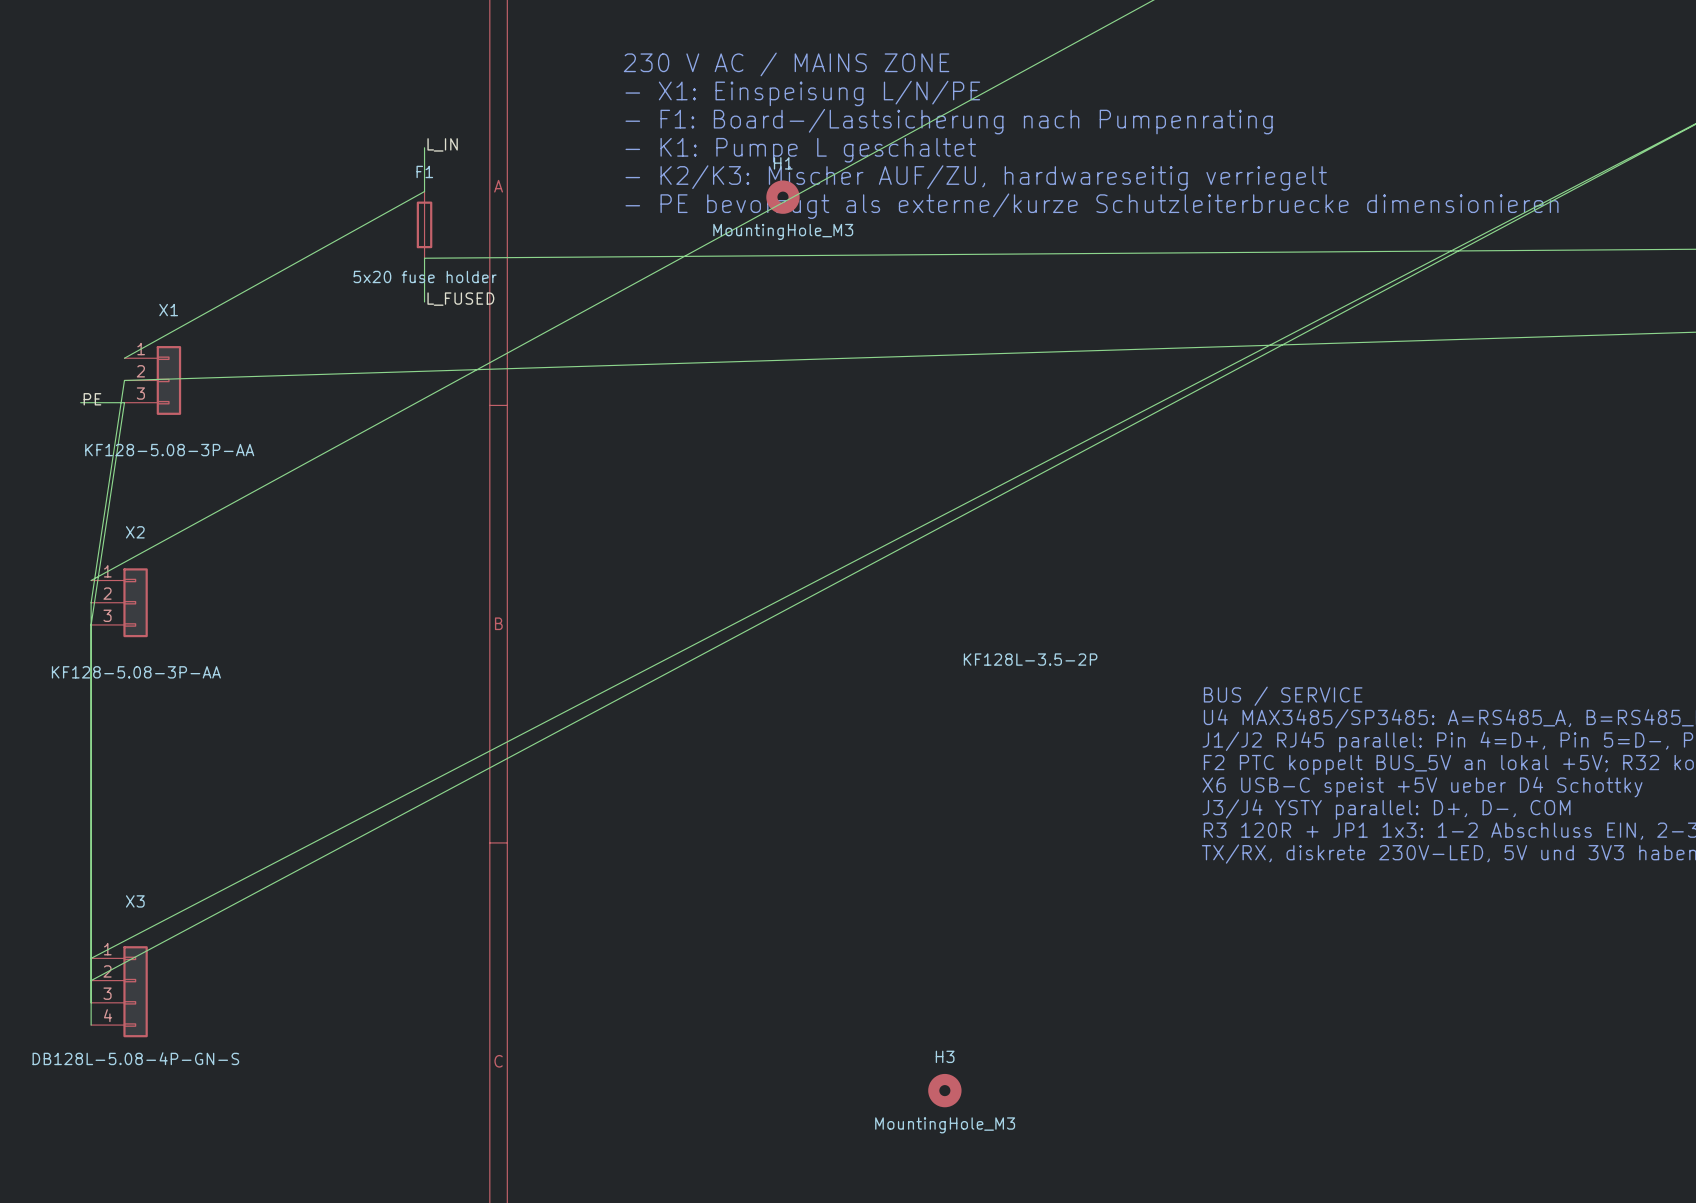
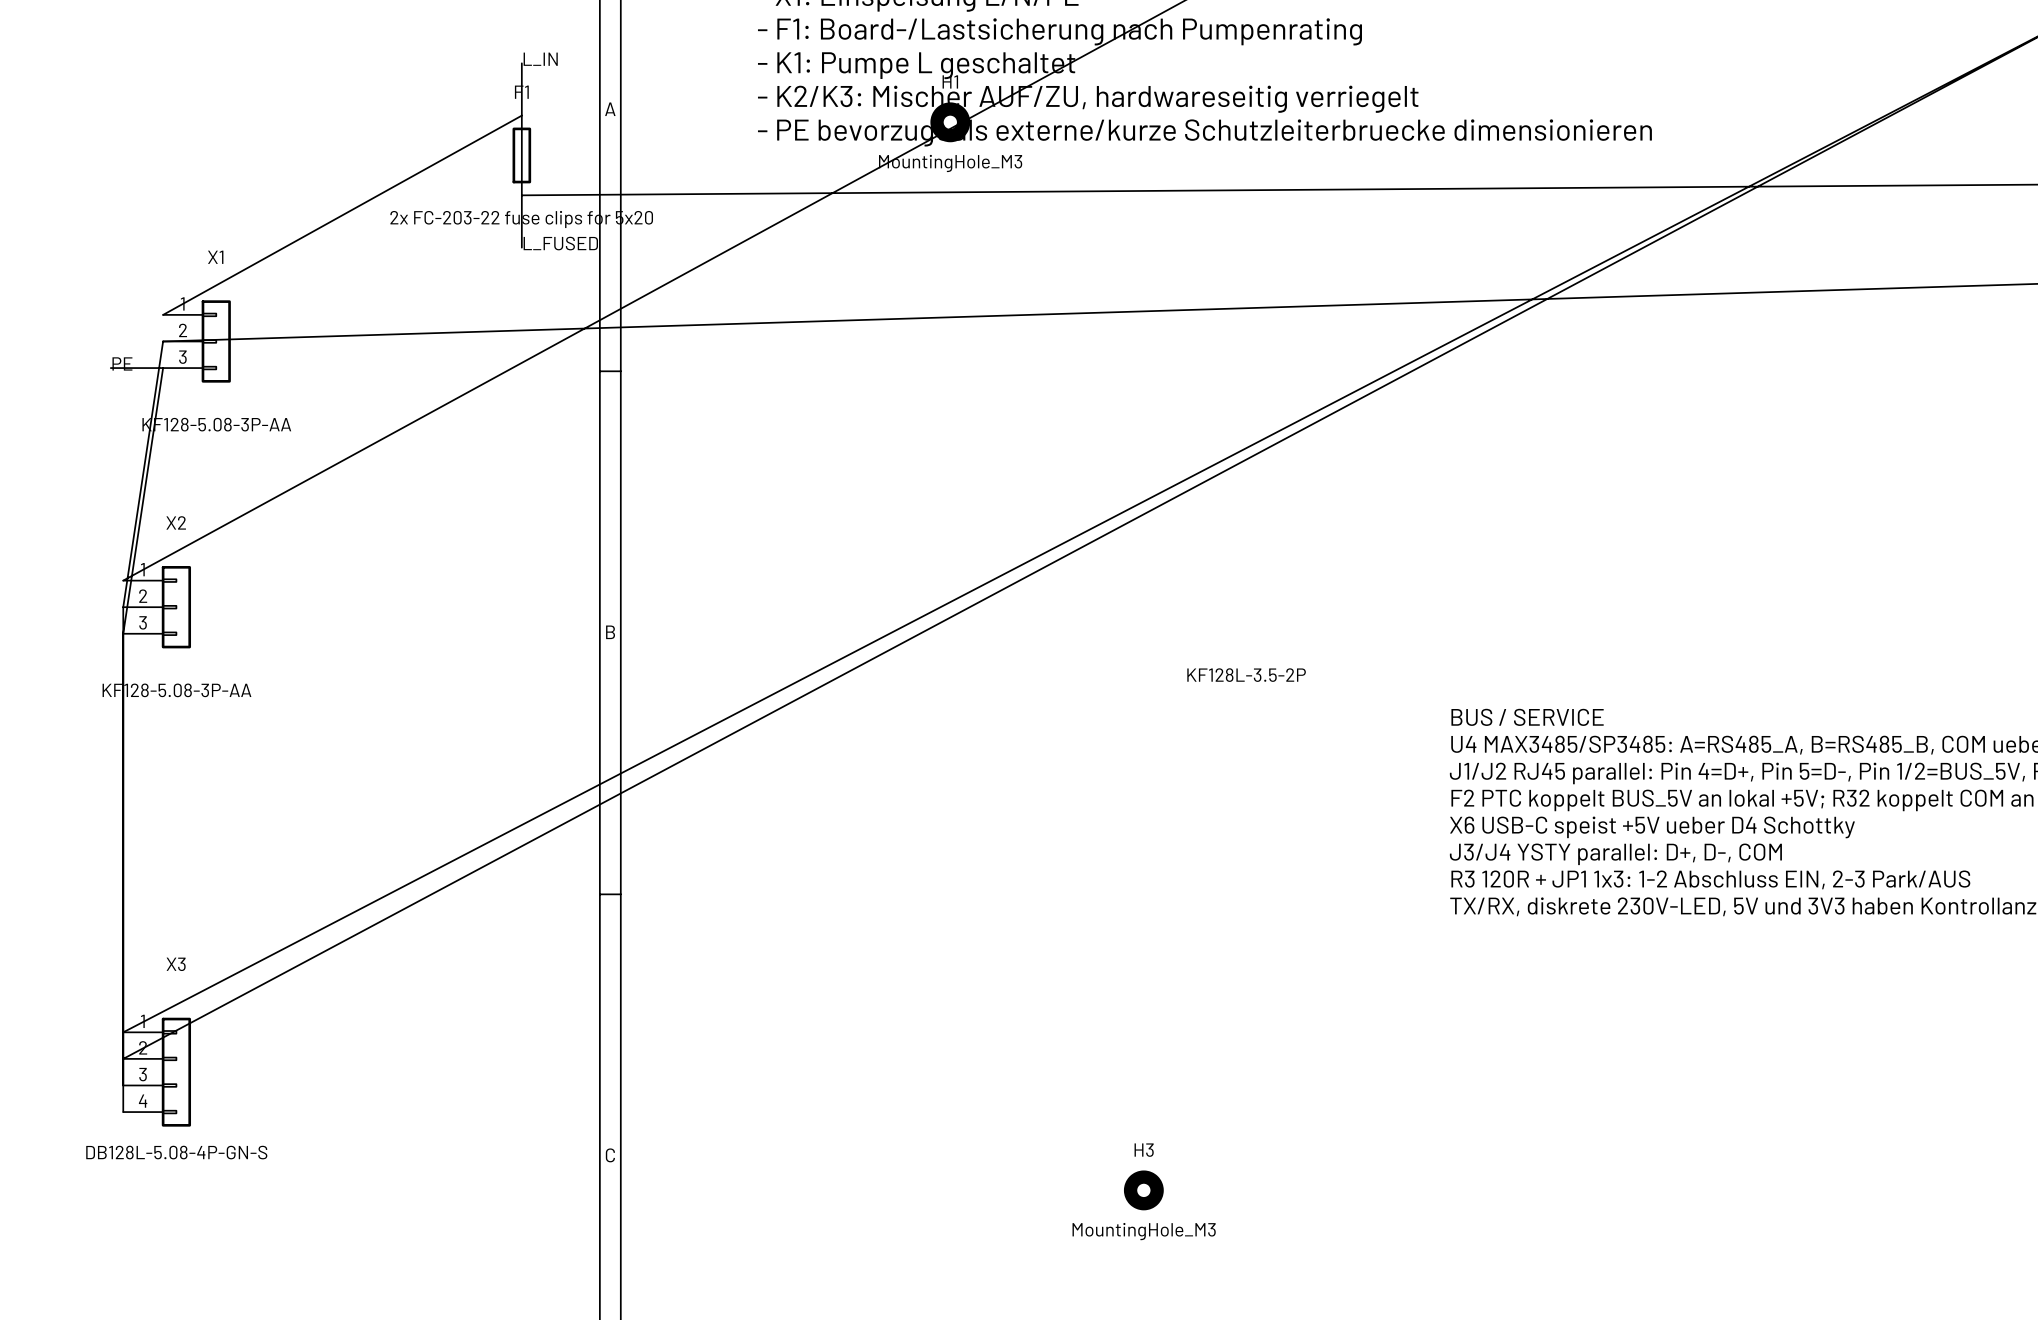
F1 value: 5x20 fuse holder (425, 276) -> 2x FC-203-22 fuse clips for 5x20 (521, 219)

